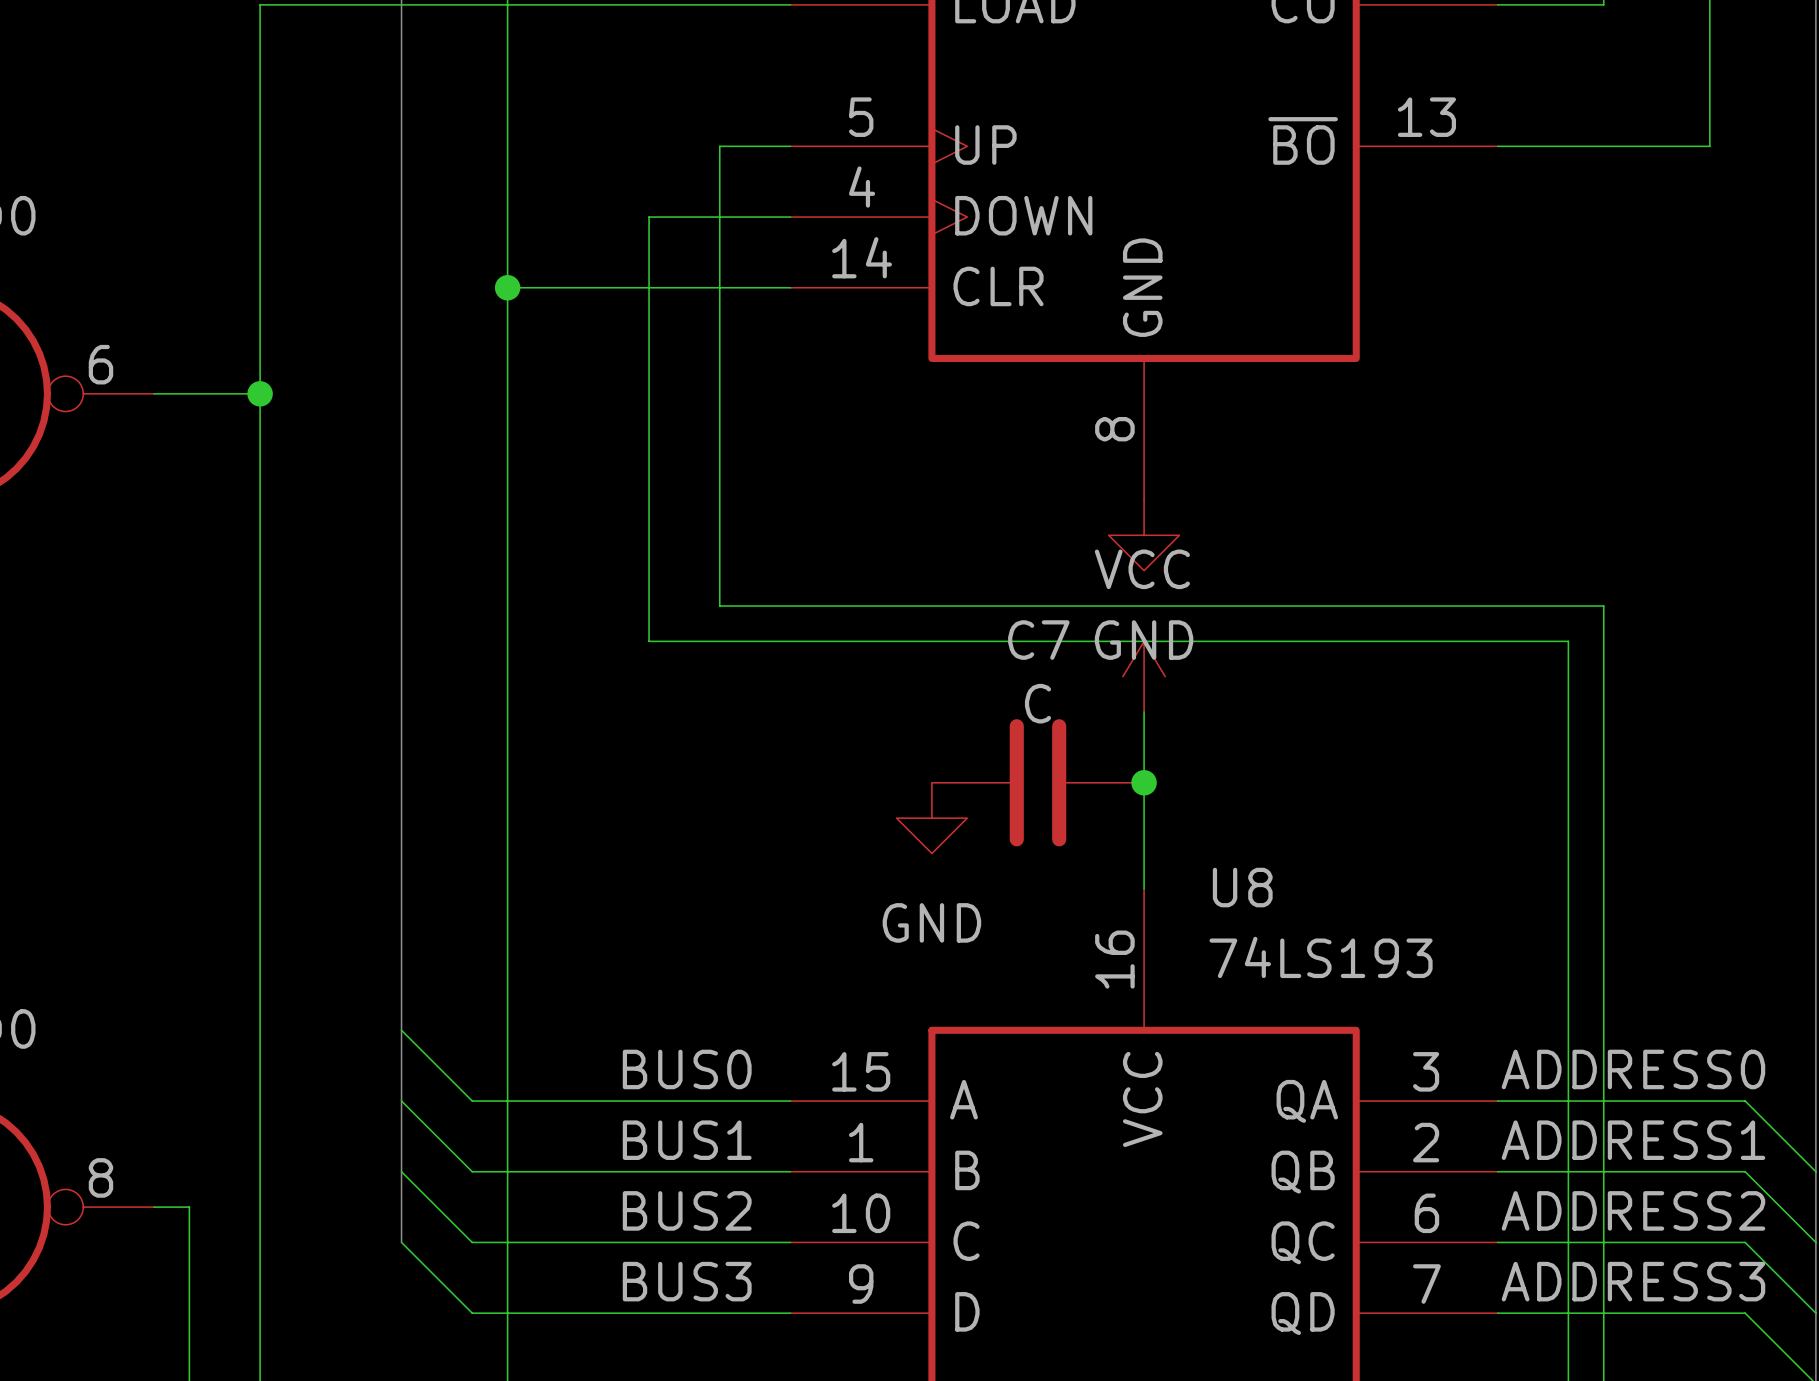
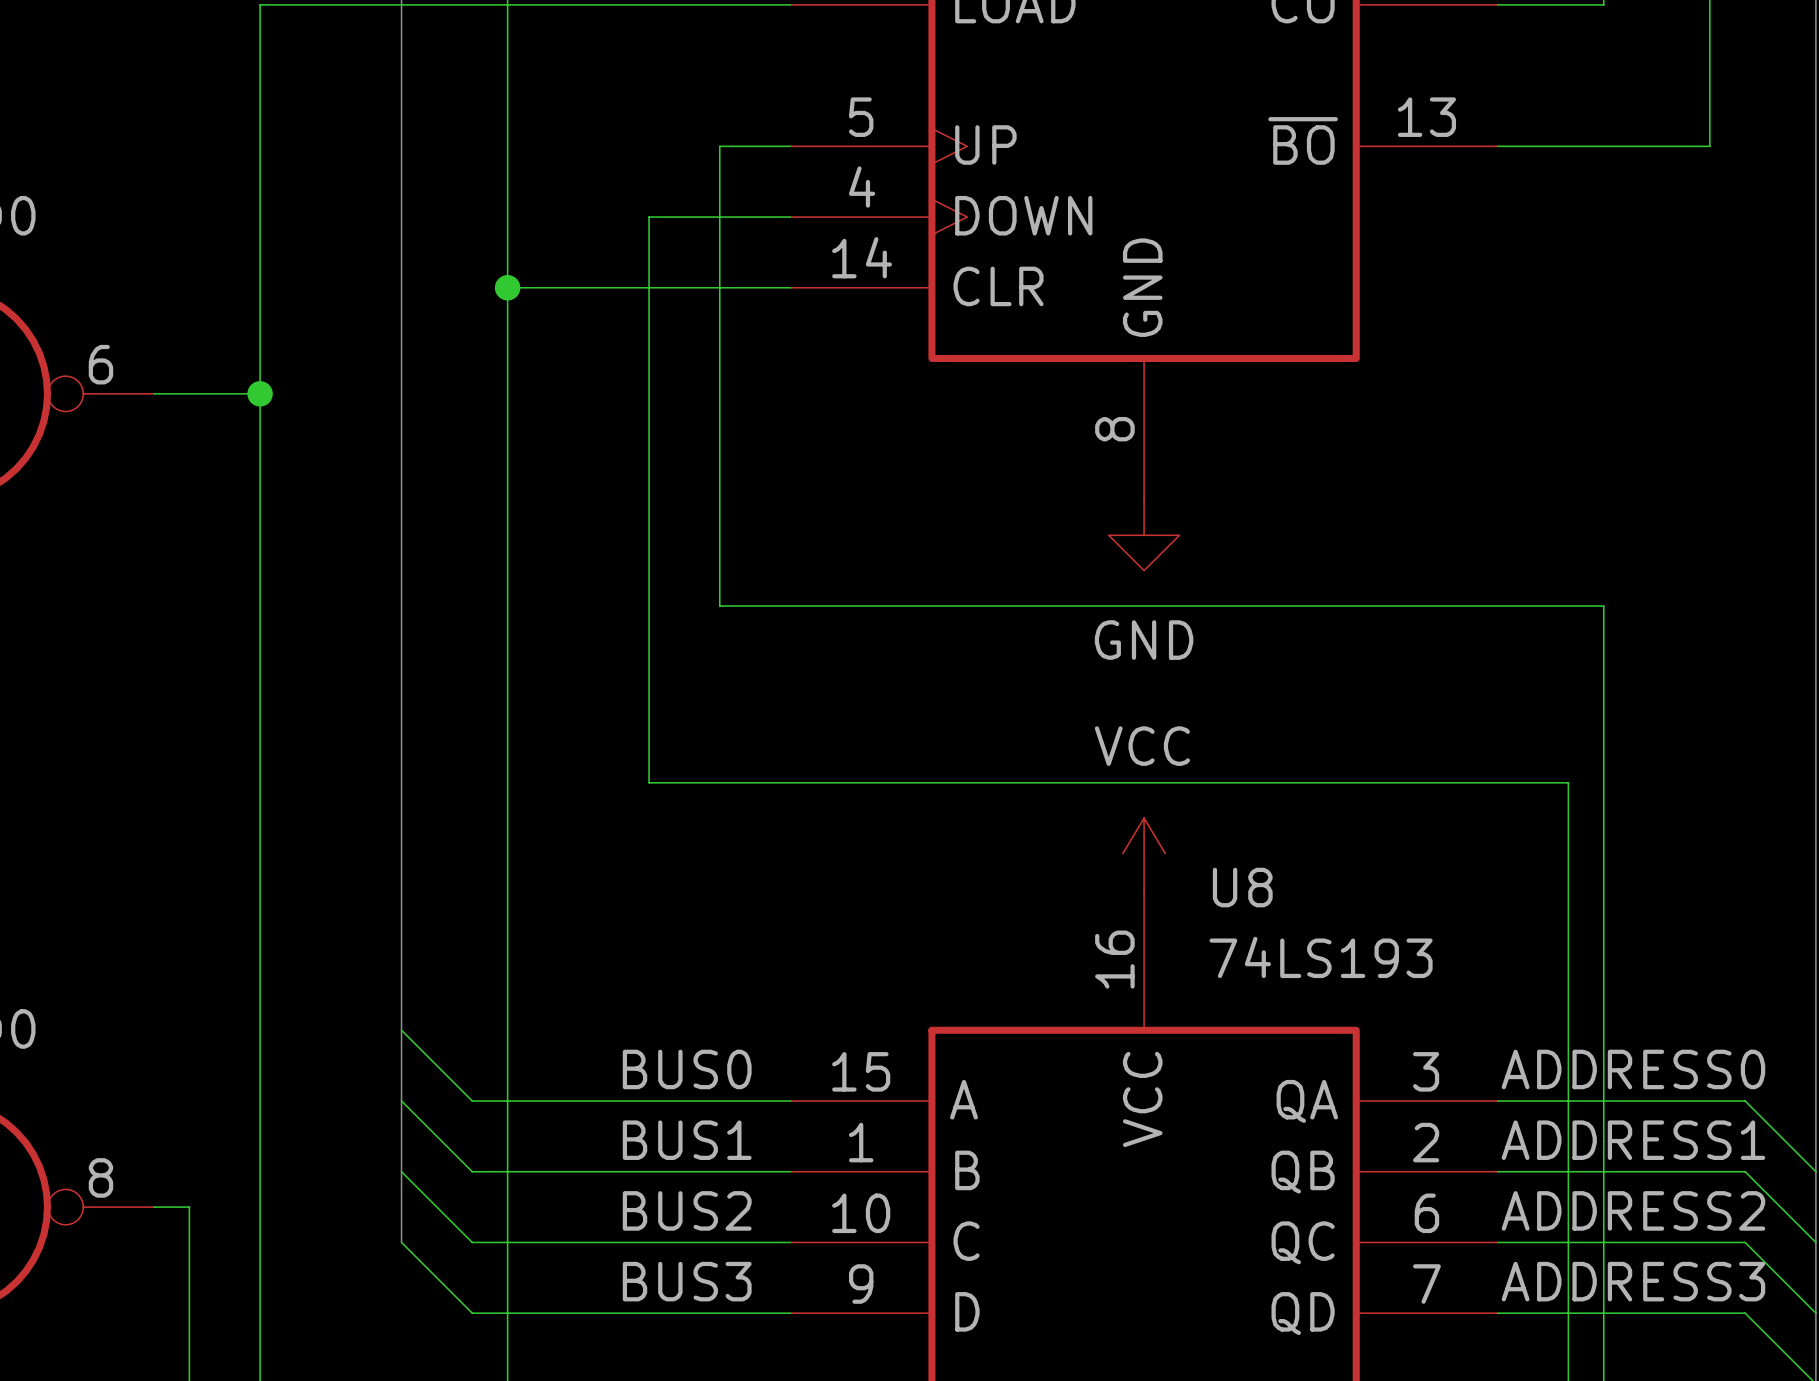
wire: (649, 641) (1568, 641) (1568, 782) -> (649, 641) (649, 782) (1568, 782)
power symbol position: VCC (1144, 676) -> VCC (1144, 853)
wire: (1144, 712) (1144, 888) -> none
C7: C (1038, 782) -> none
junction: (1144, 782) -> none
power symbol: GND (931, 818) -> none

